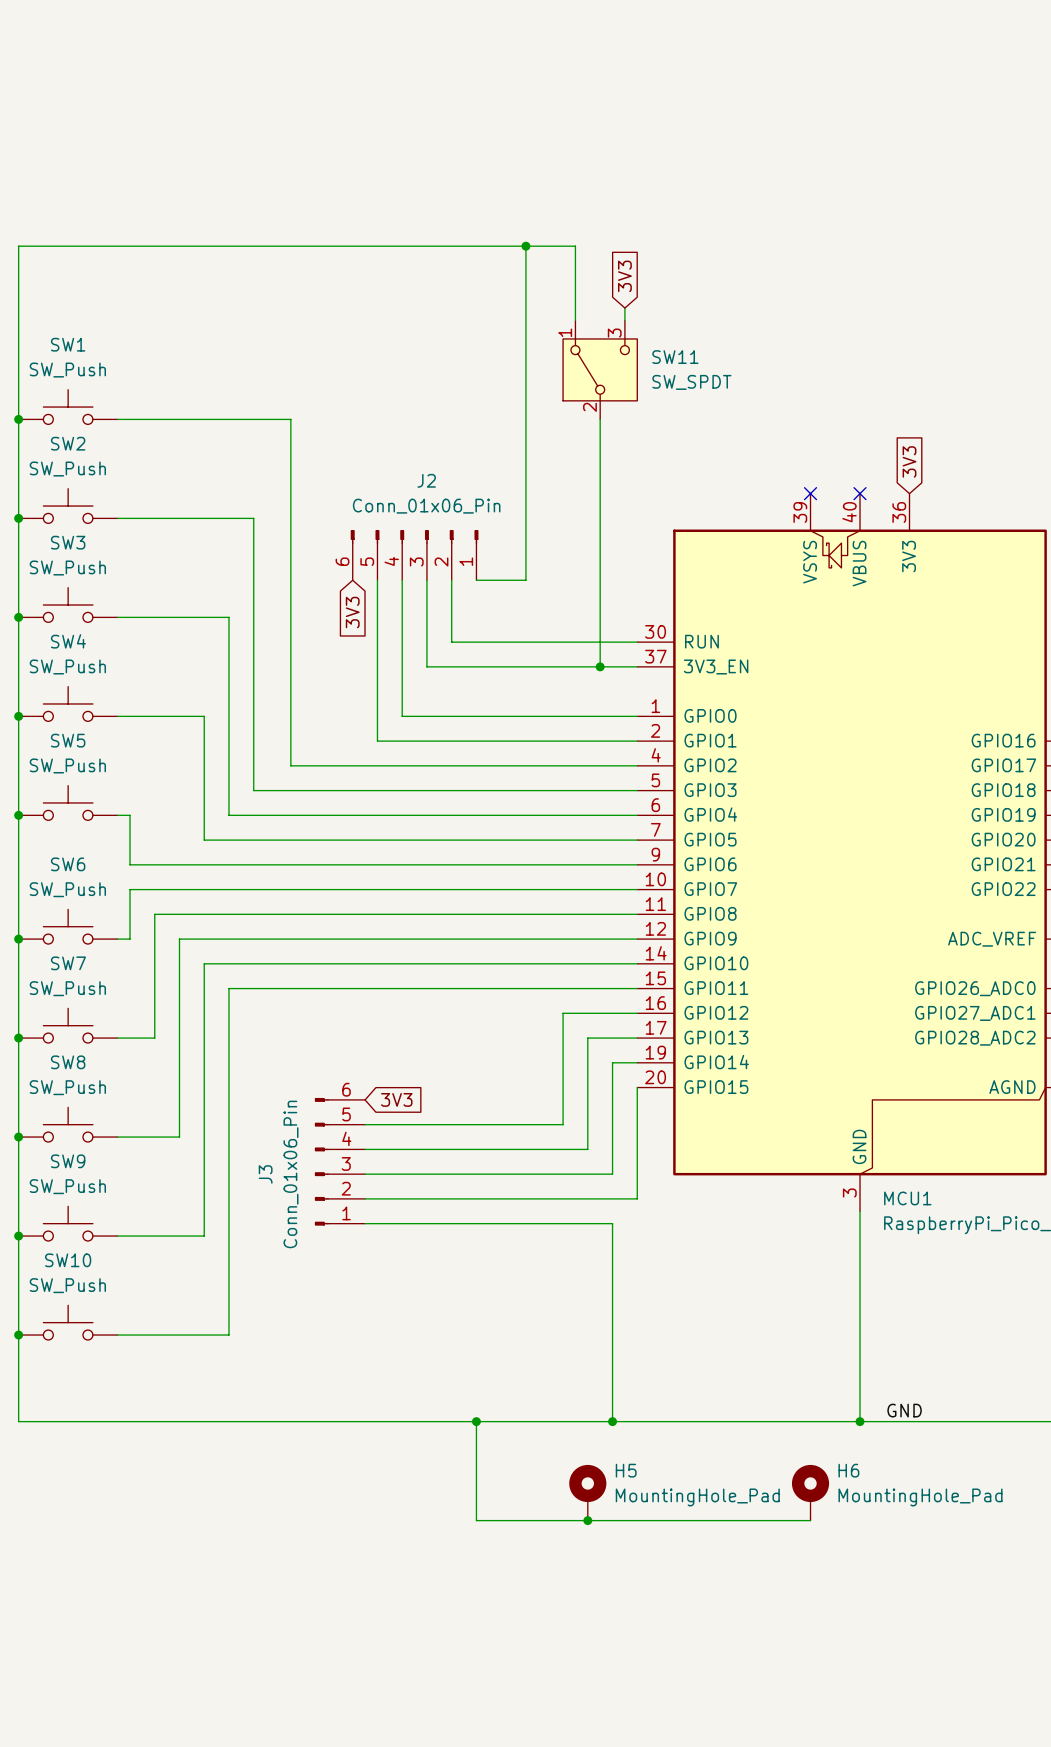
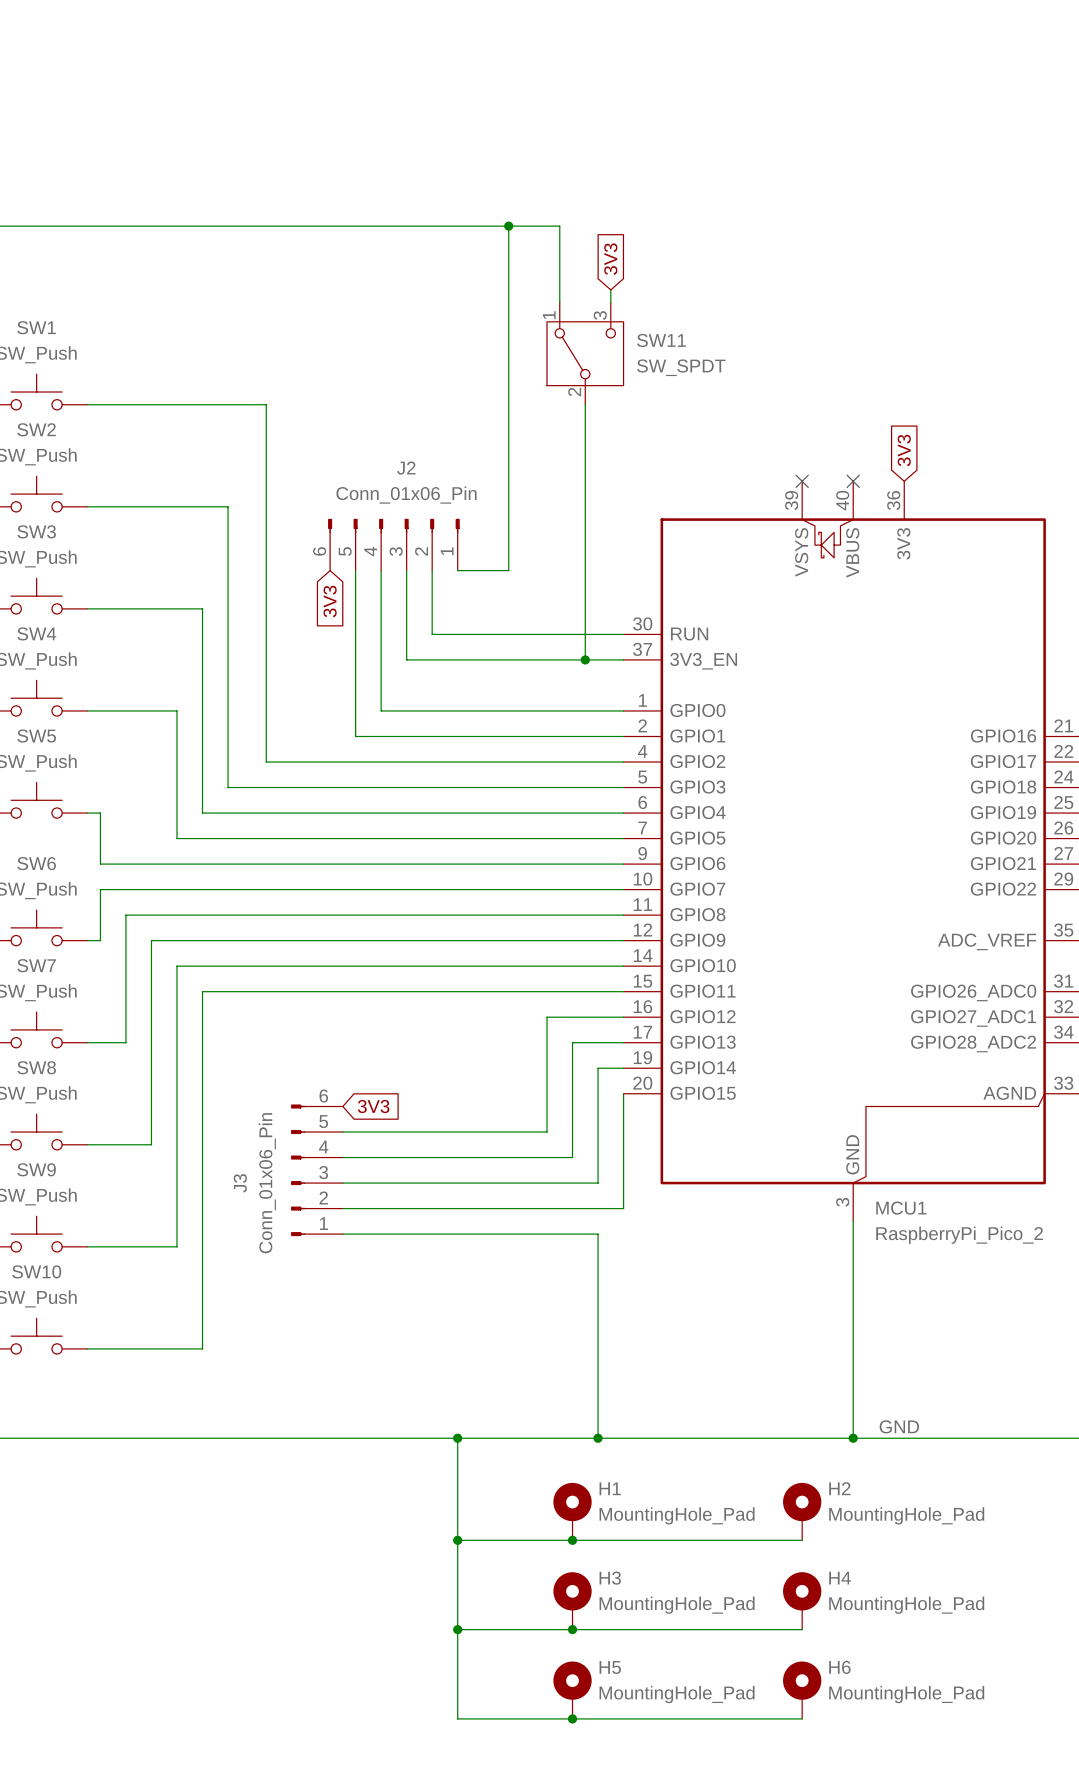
H5 name: H5 (626, 1470) -> H1 (610, 1488)
H6 name: H6 (848, 1470) -> H2 (839, 1488)
wire: none -> (457, 1540) (457, 1718) (802, 1718)
junction: none -> (457, 1540)
H3: none -> MountingHole_Pad (572, 1600)
H4: none -> MountingHole_Pad (802, 1600)
wire: none -> (457, 1629) (802, 1629)
junction: none -> (457, 1629)
junction: none -> (572, 1629)
H5: none -> MountingHole_Pad (572, 1690)
H6: none -> MountingHole_Pad (802, 1690)
junction: none -> (572, 1718)

